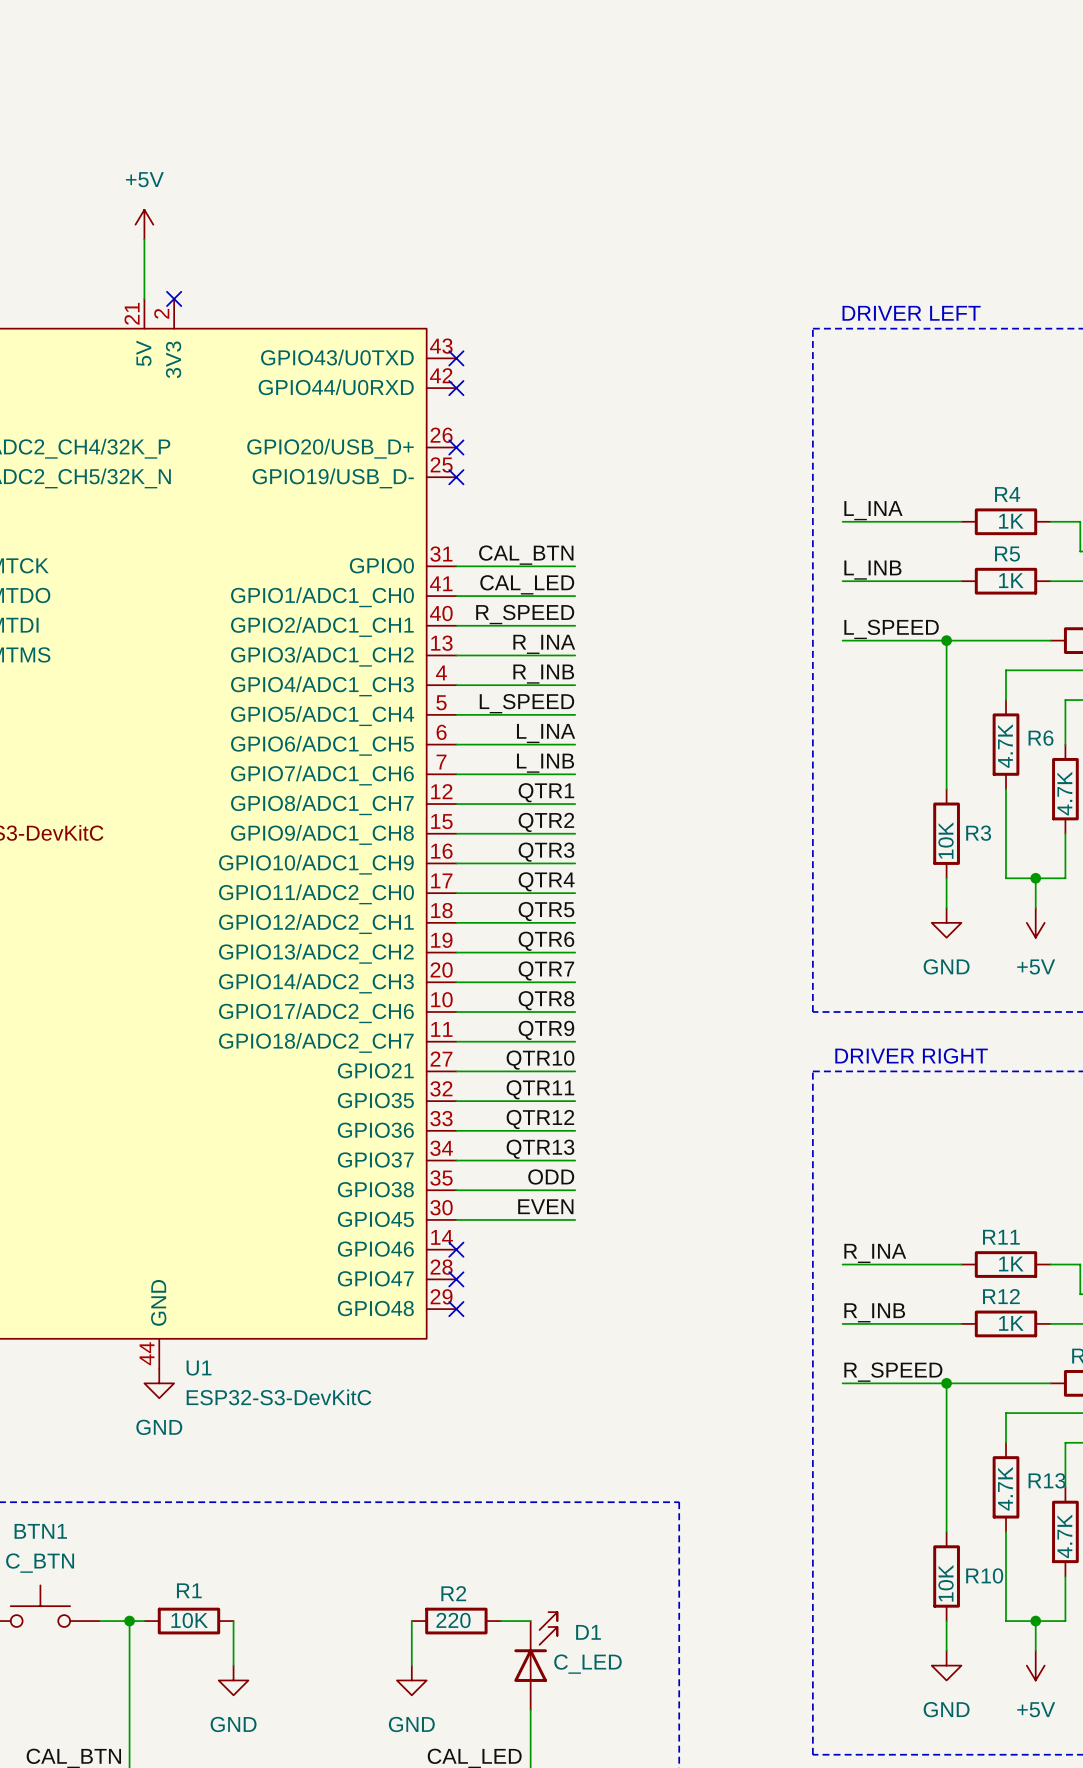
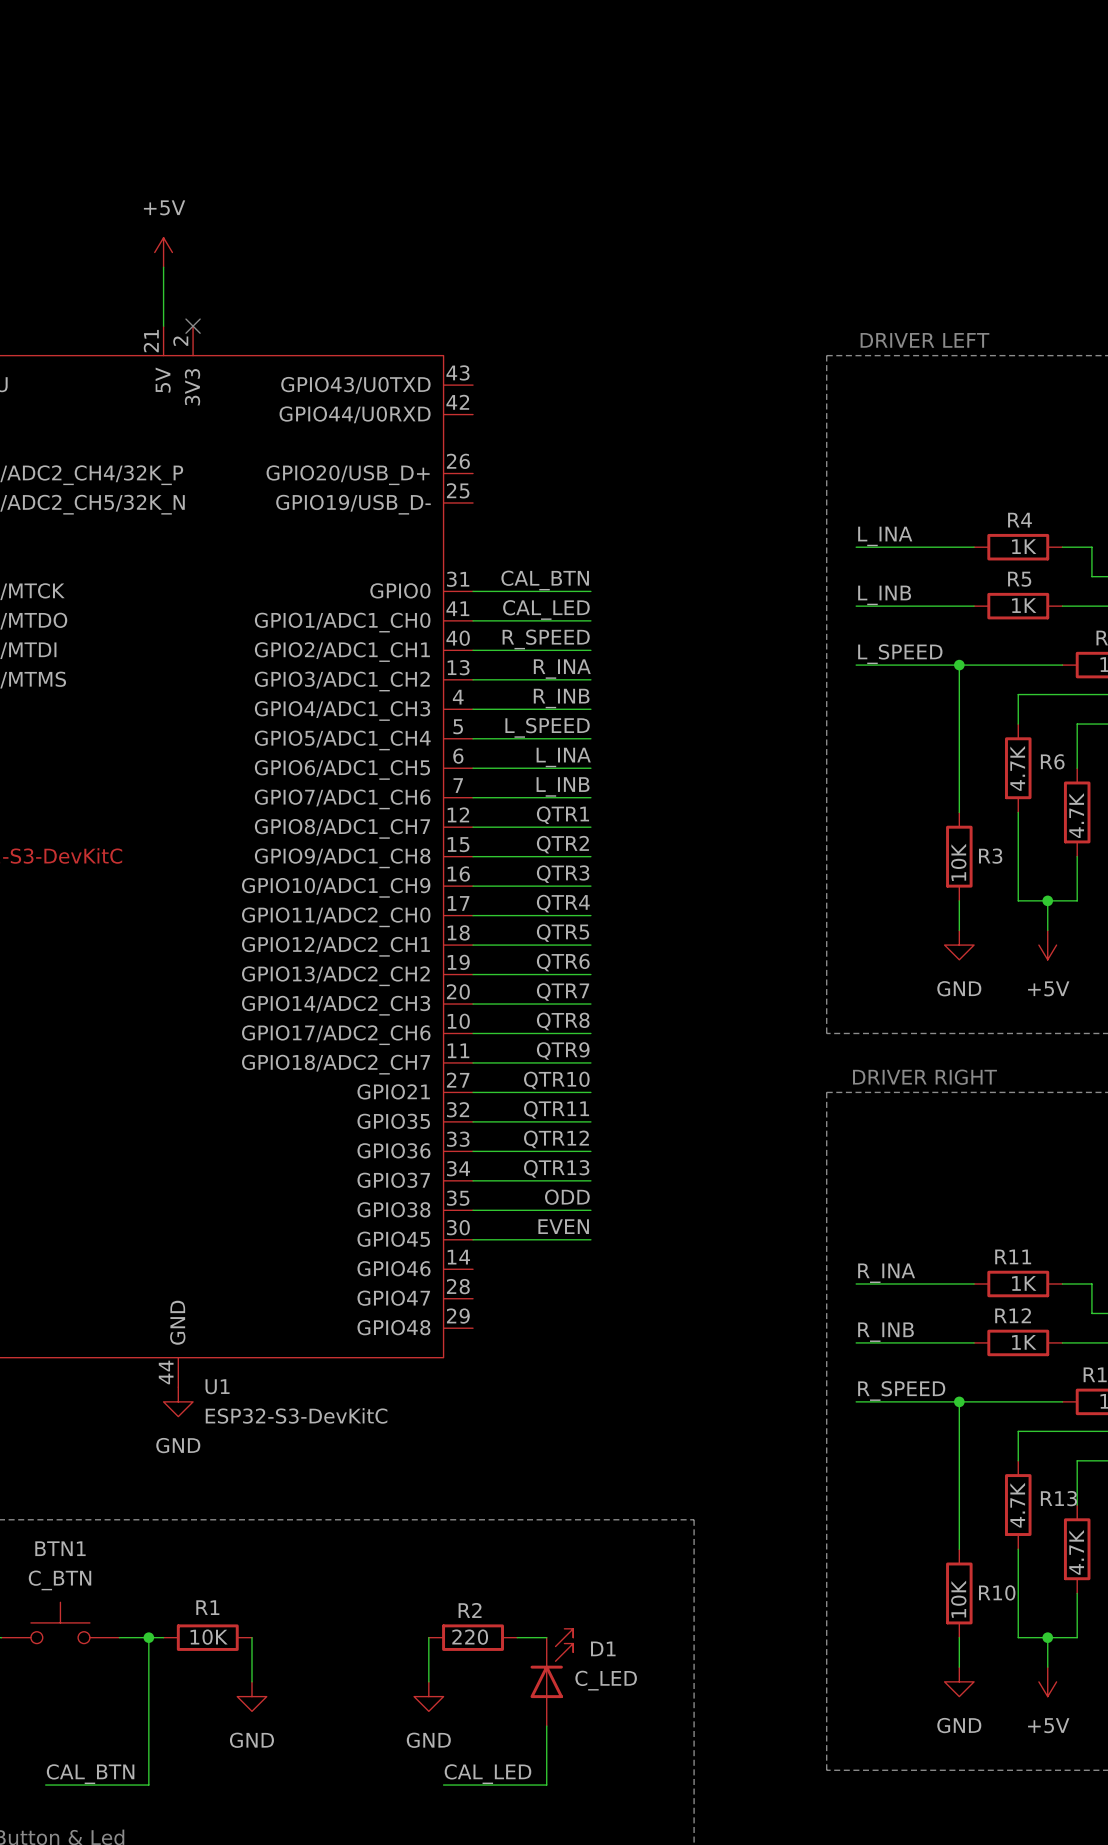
no-connect mark: (456, 358) -> none
no-connect mark: (456, 388) -> none
no-connect mark: (456, 447) -> none
no-connect mark: (456, 477) -> none
no-connect mark: (456, 1249) -> none
no-connect mark: (456, 1279) -> none
no-connect mark: (456, 1309) -> none

